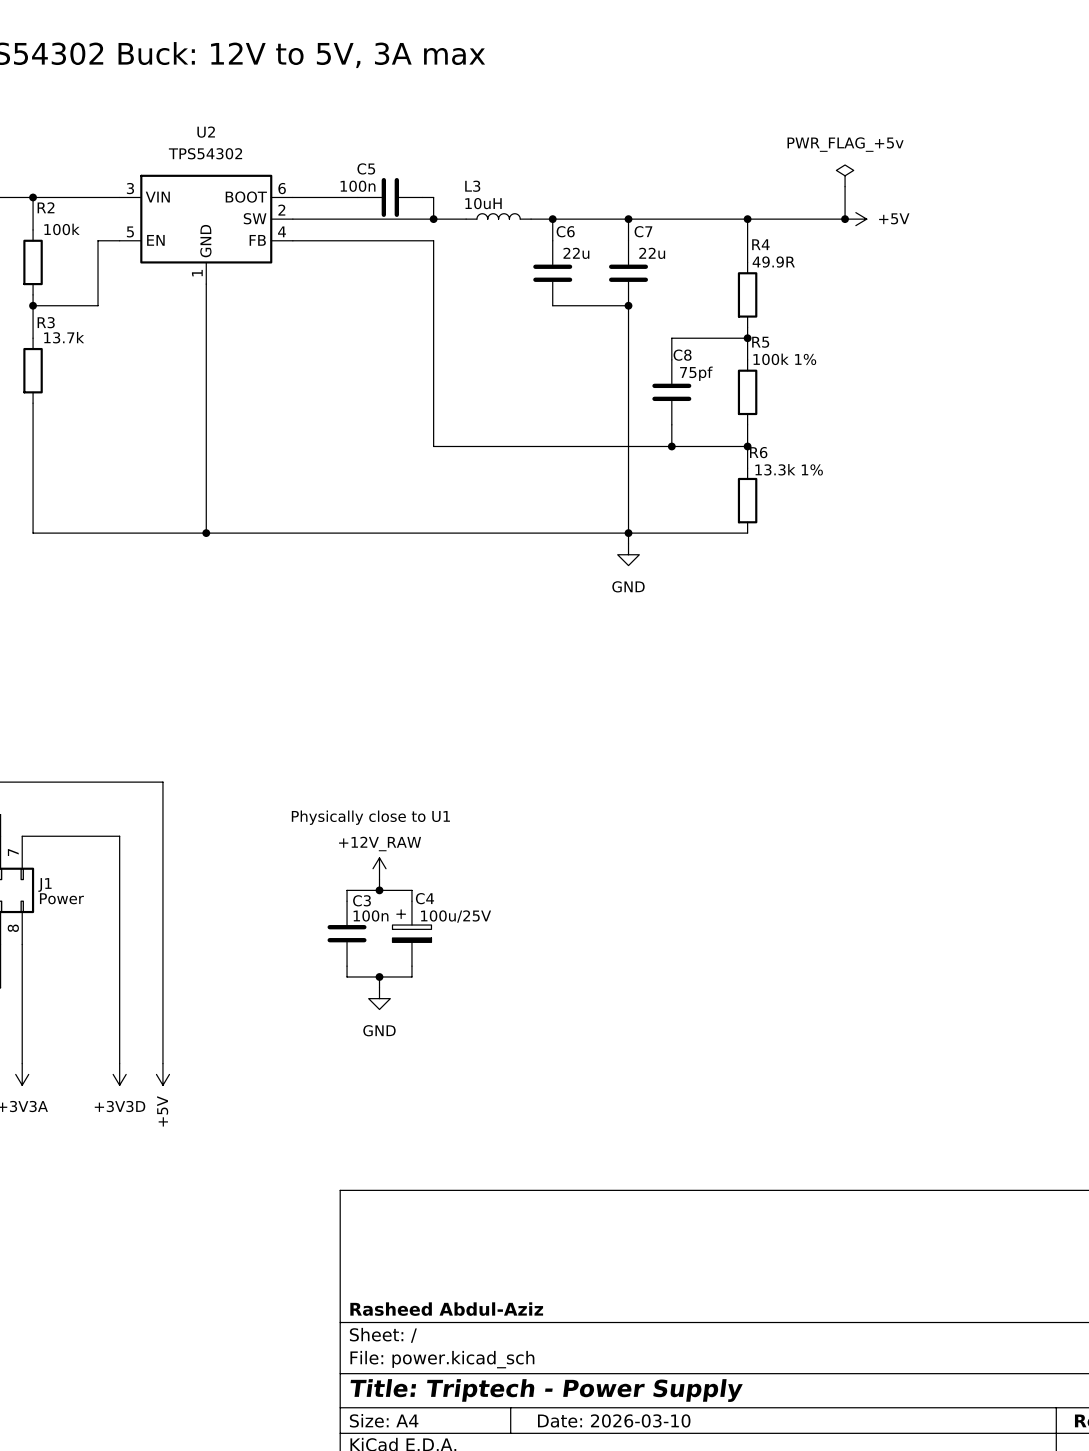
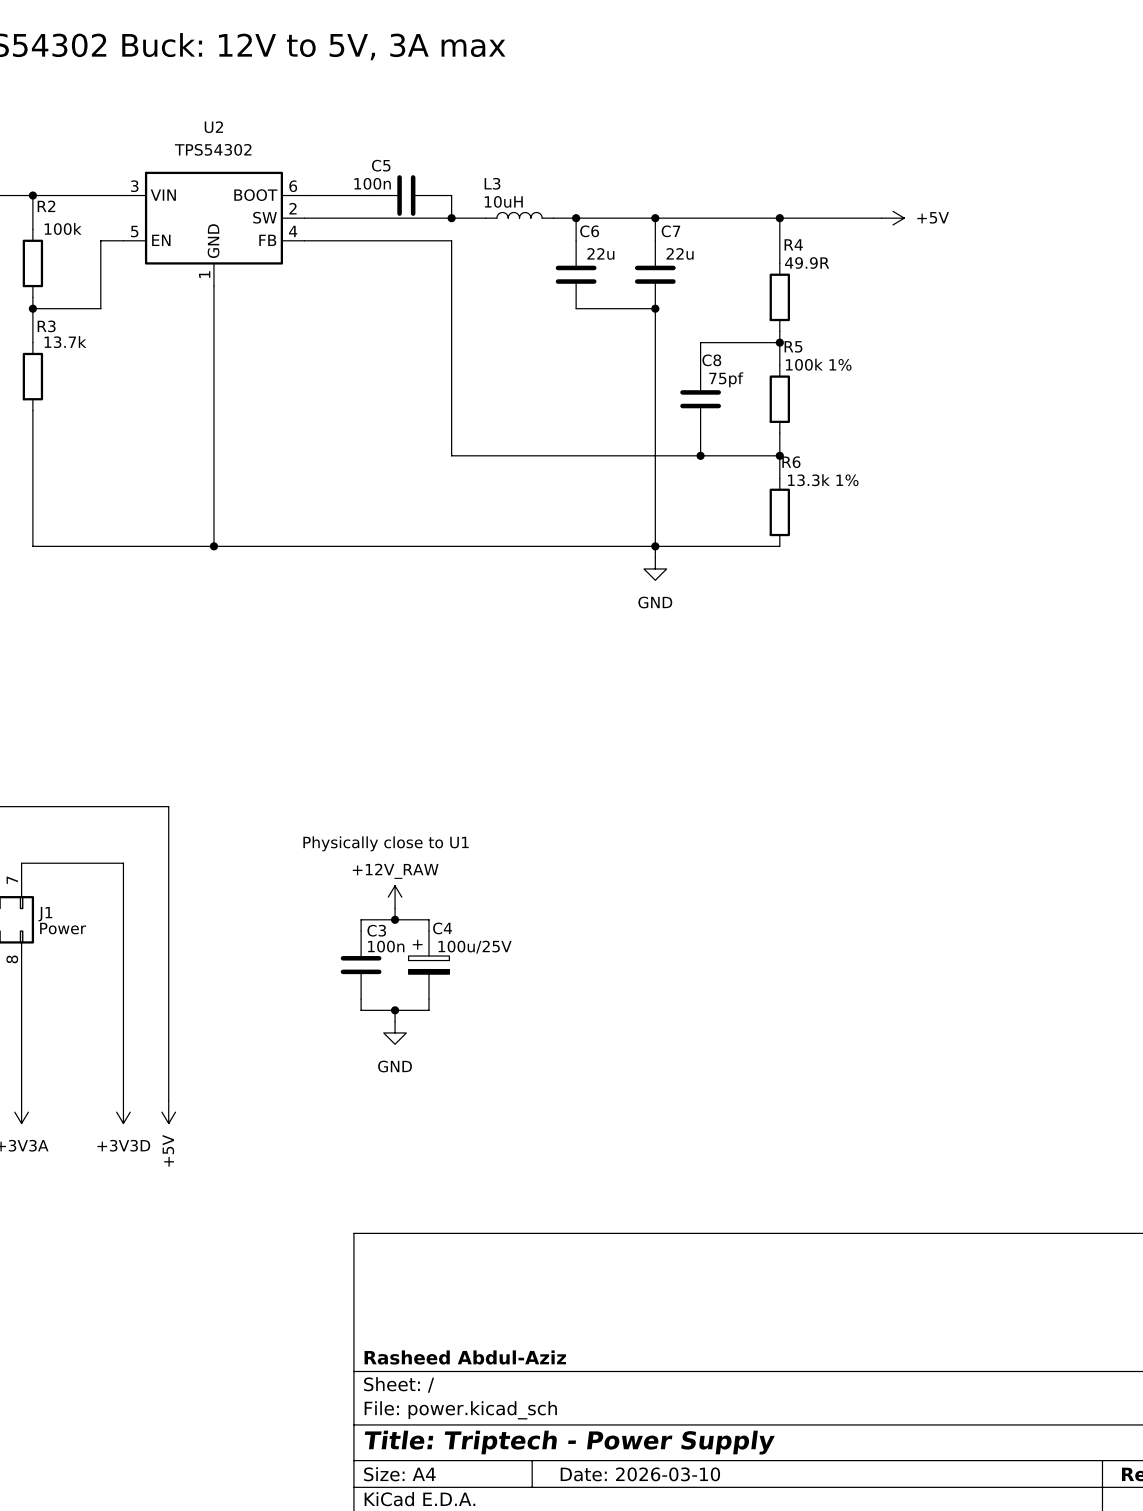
power symbol: PWR_FLAG_+5v (845, 175) -> none
wire: (845, 186) (845, 219) -> none
junction: (845, 219) -> none

